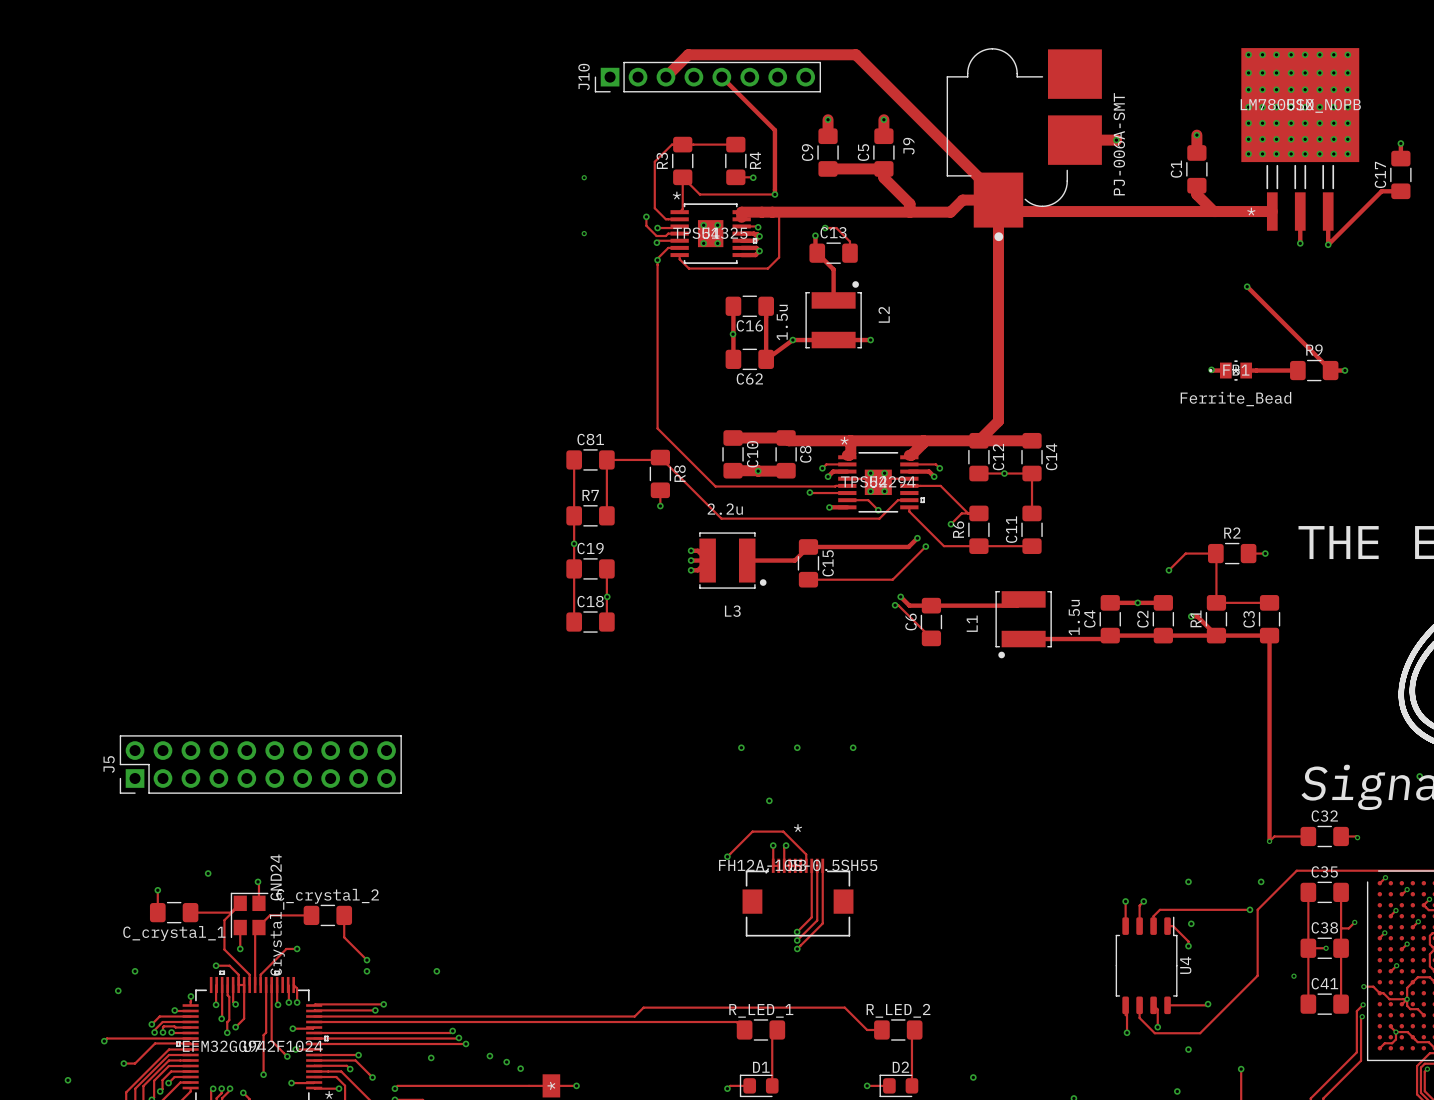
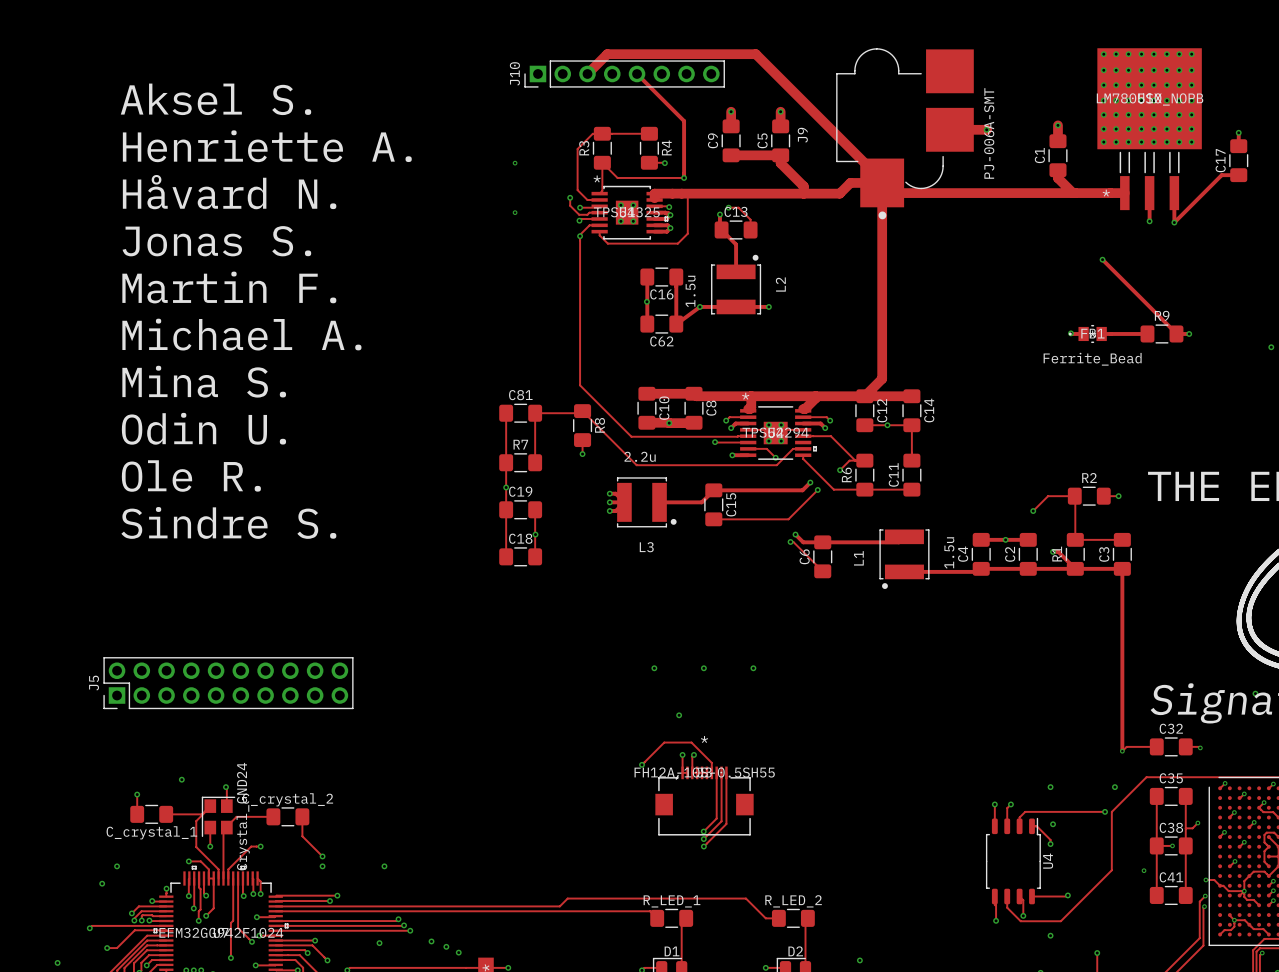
text: none -> Aksel S. (215, 99)
text: none -> Henriette A. (267, 146)
text: none -> Håvard N. (229, 192)
text: none -> Jonas S. (216, 241)
text: none -> Martin F. (229, 287)
text: none -> Michael A. (241, 334)
text: none -> Mina S. (204, 381)
text: none -> Odin U. (203, 428)
text: none -> Ole R. (191, 476)
text: none -> Sindre S. (228, 522)

